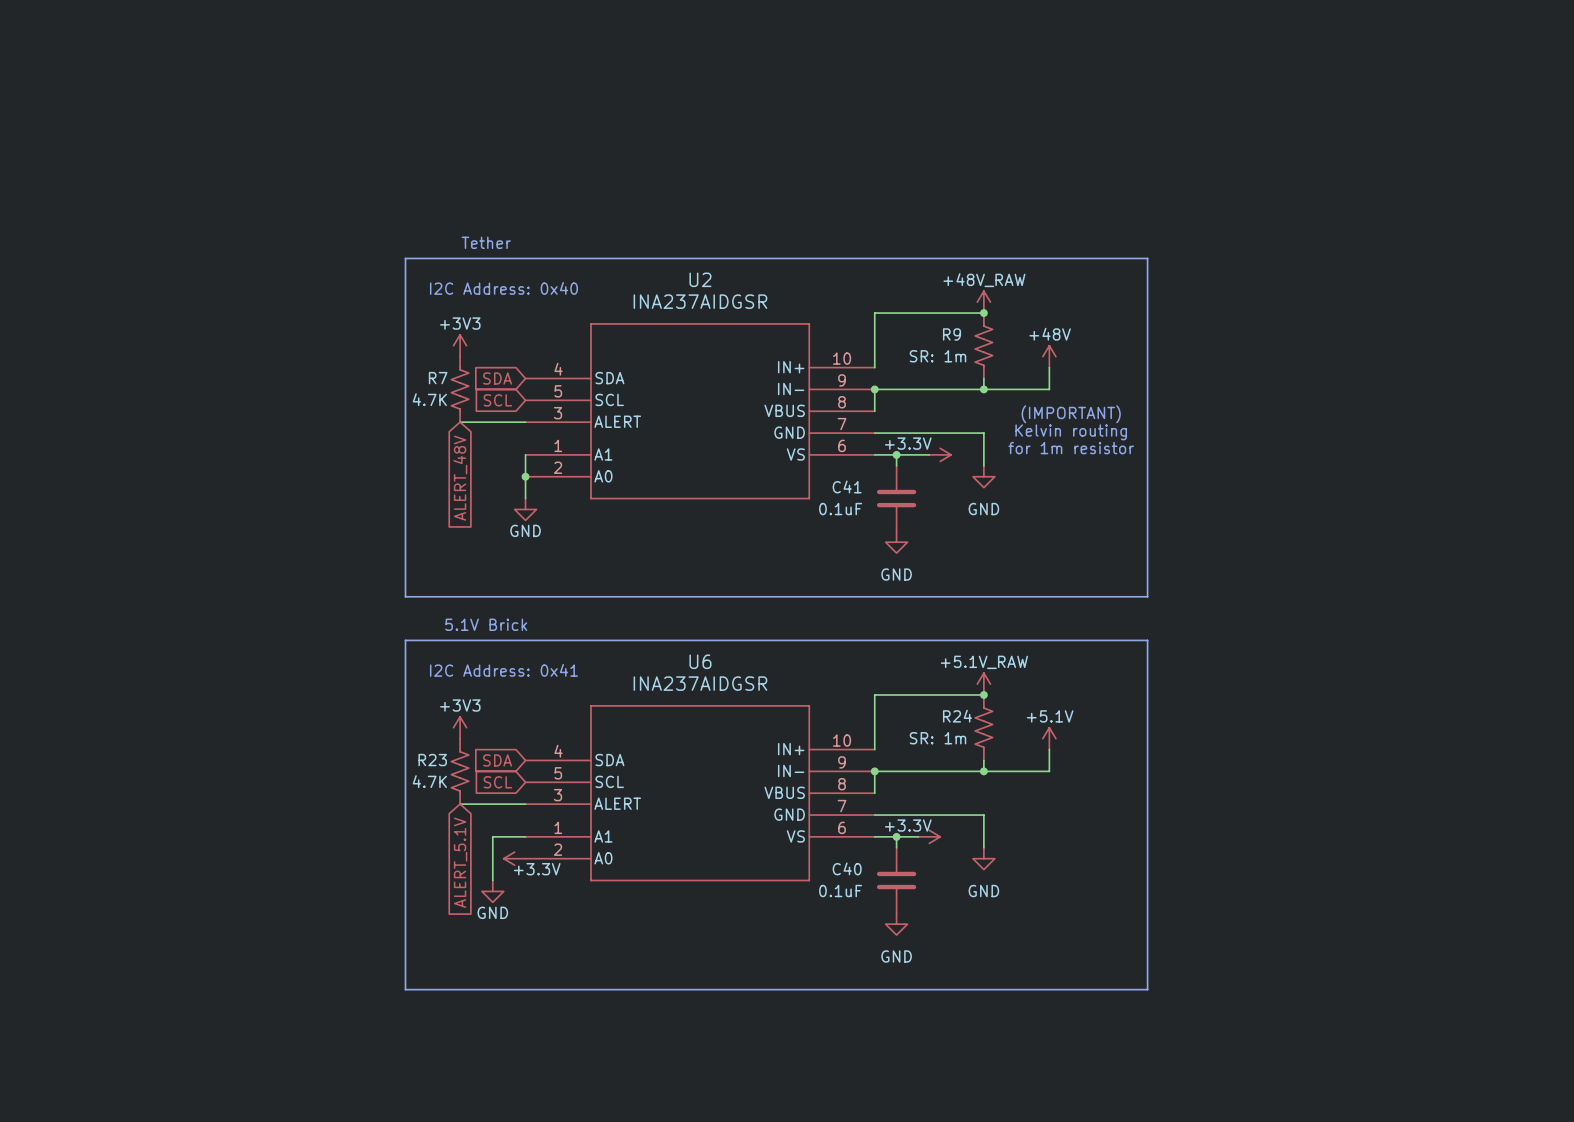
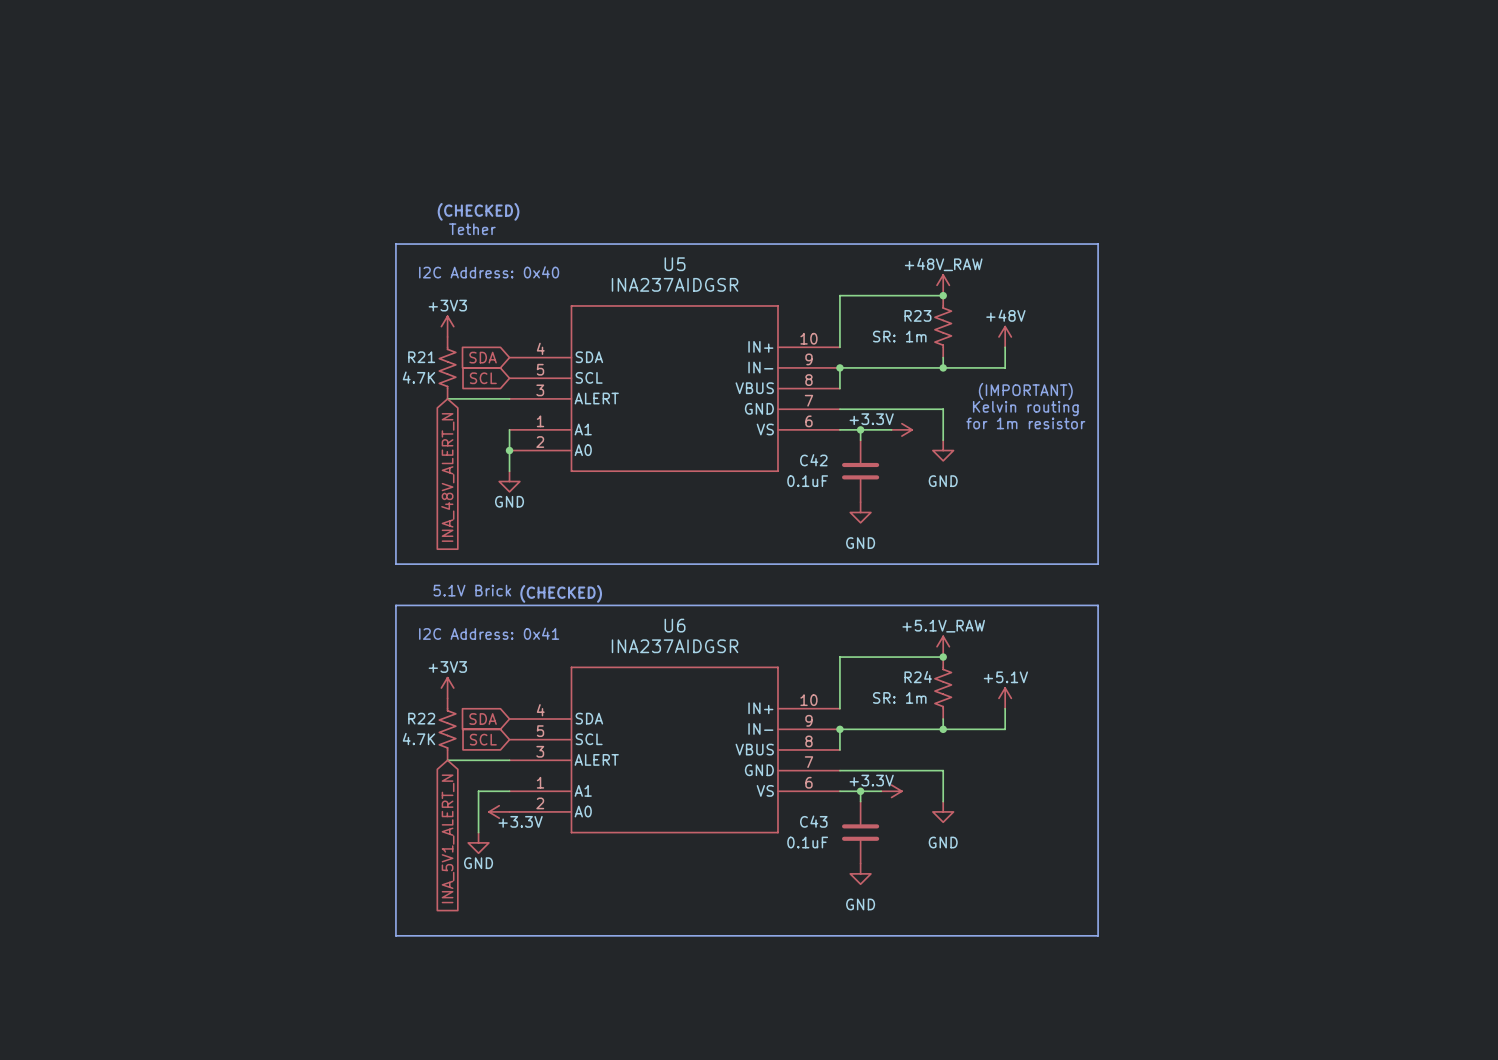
text: none -> (CHECKED) (478, 211)
U2 name: U2 (700, 279) -> U5 (675, 264)
R9 name: R9 (952, 334) -> R23 (917, 315)
R7 name: R7 (438, 378) -> R21 (421, 357)
global label: ALERT_48V (460, 478) -> INA_48V_ALERT_N (447, 477)
C41 name: C41 (847, 486) -> C42 (813, 460)
text: none -> (CHECKED) (561, 593)
R23 name: R23 (432, 760) -> R22 (421, 718)
global label: ALERT_5.1V (460, 862) -> INA_5V1_ALERT_N (448, 838)
C40 name: C40 (847, 868) -> C43 (813, 821)

